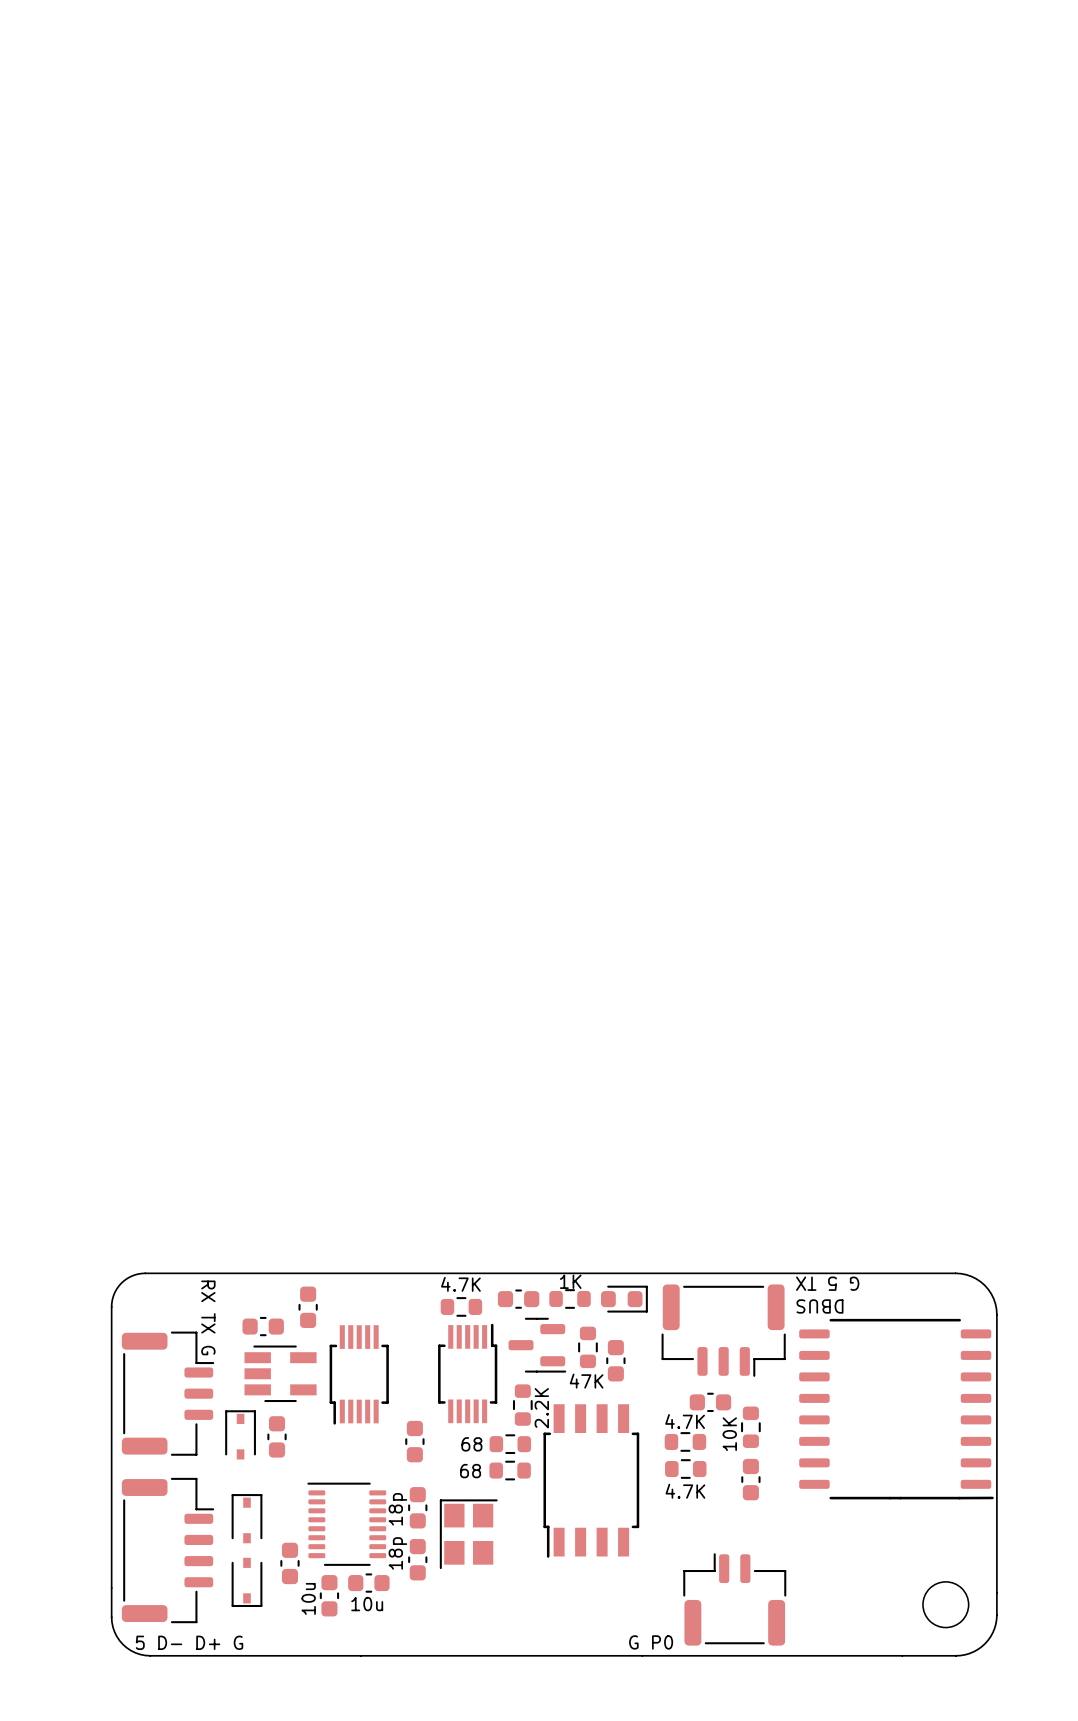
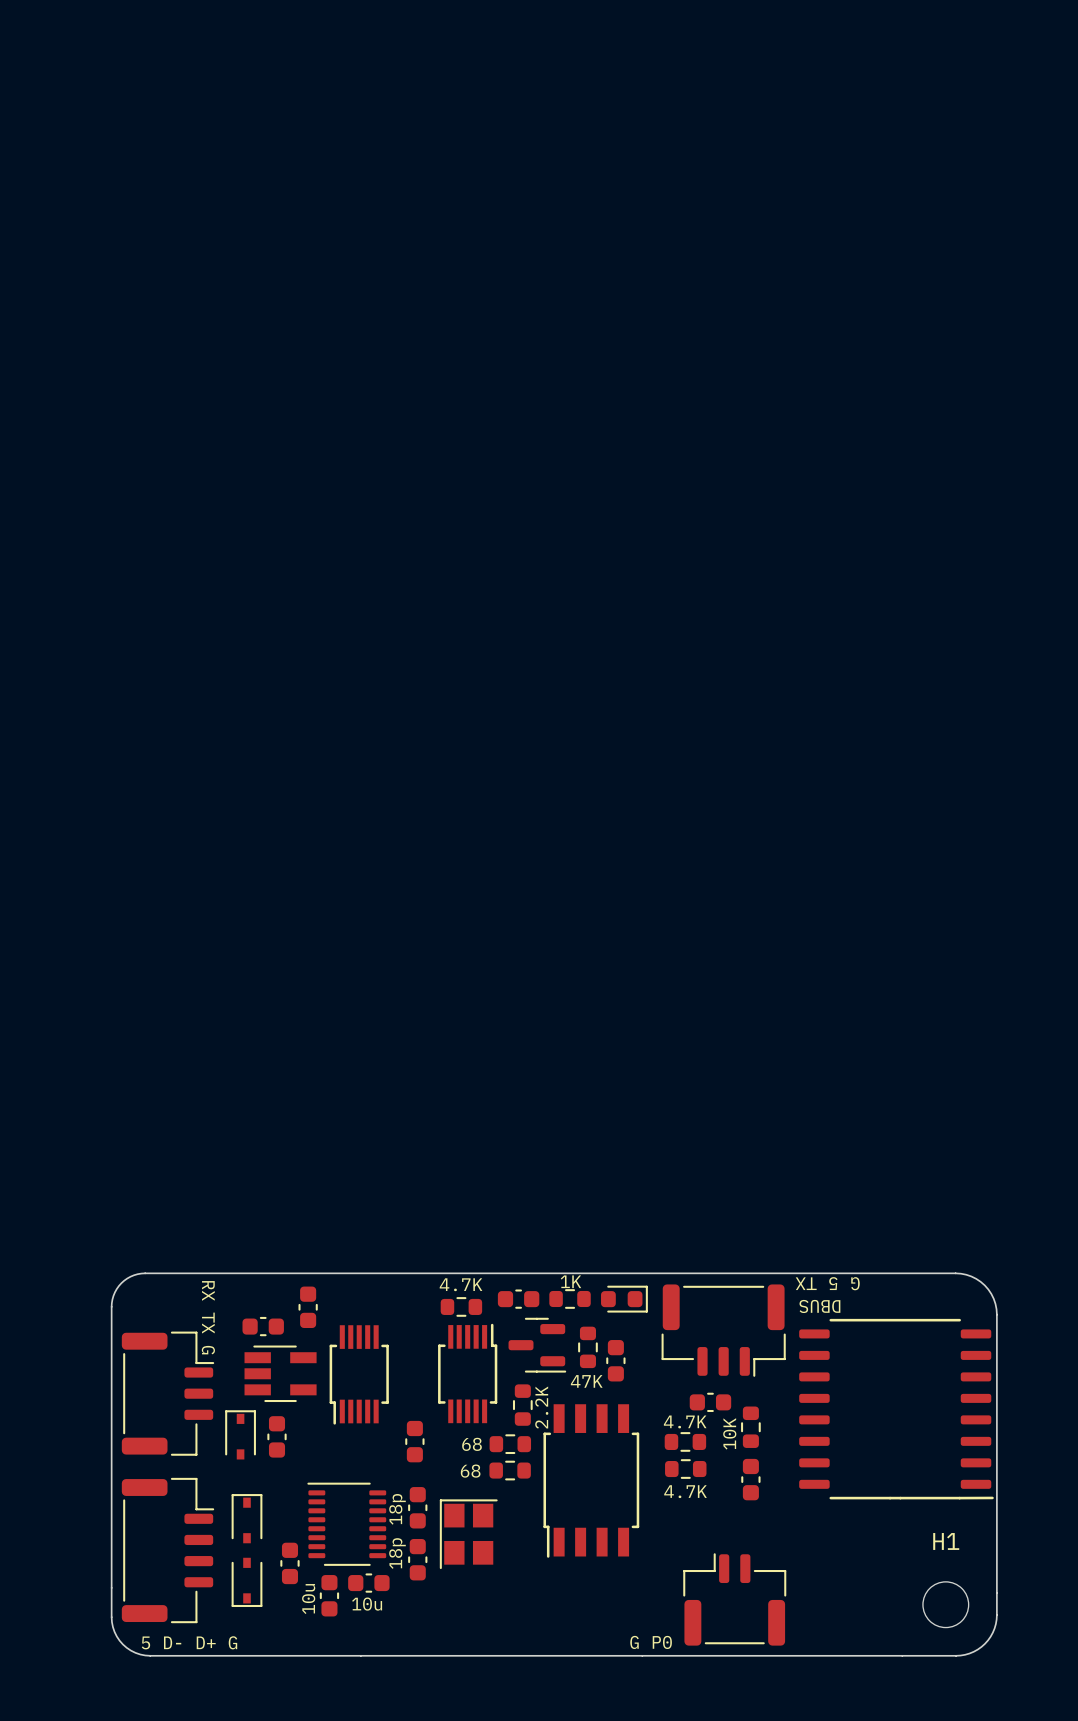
H1 name: none -> H1 (946, 1541)

